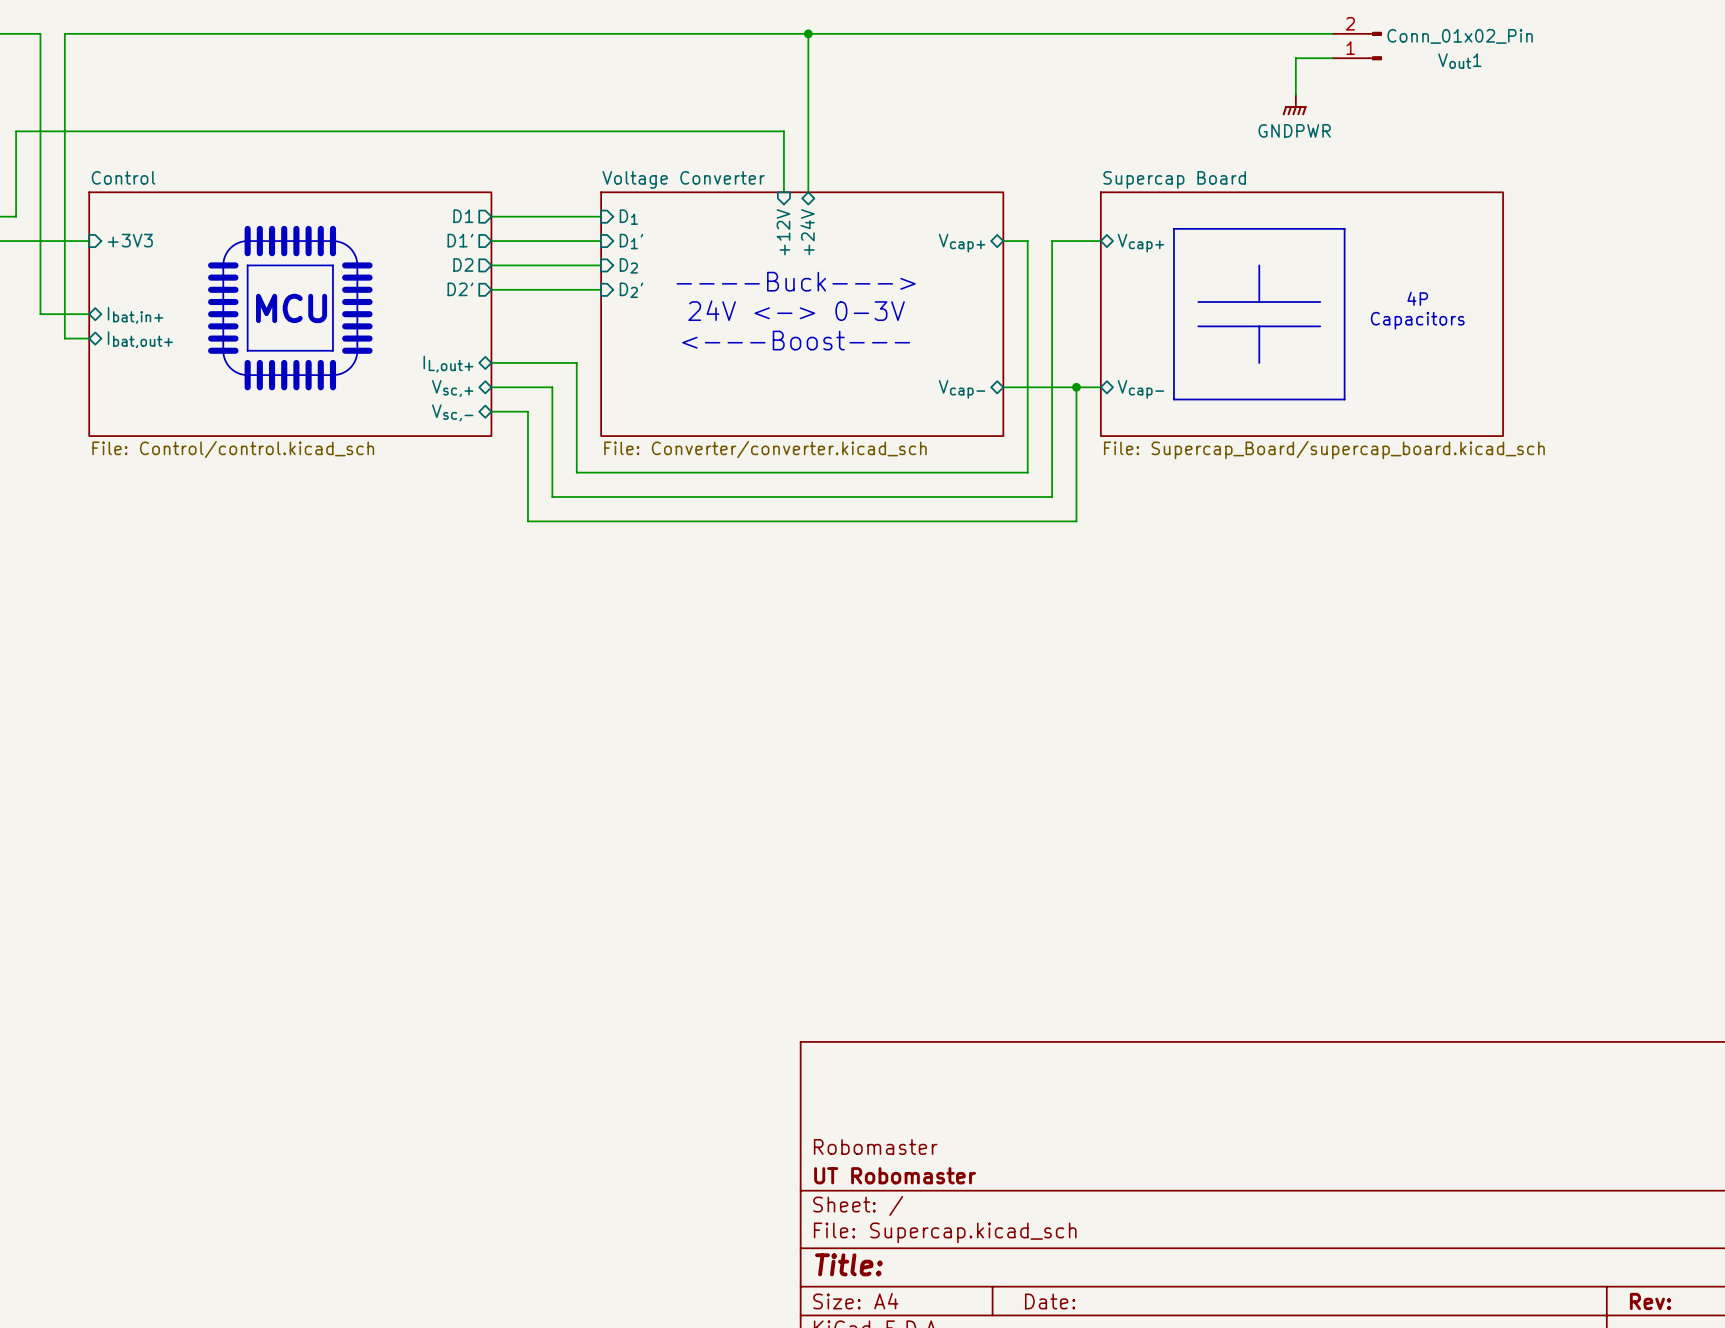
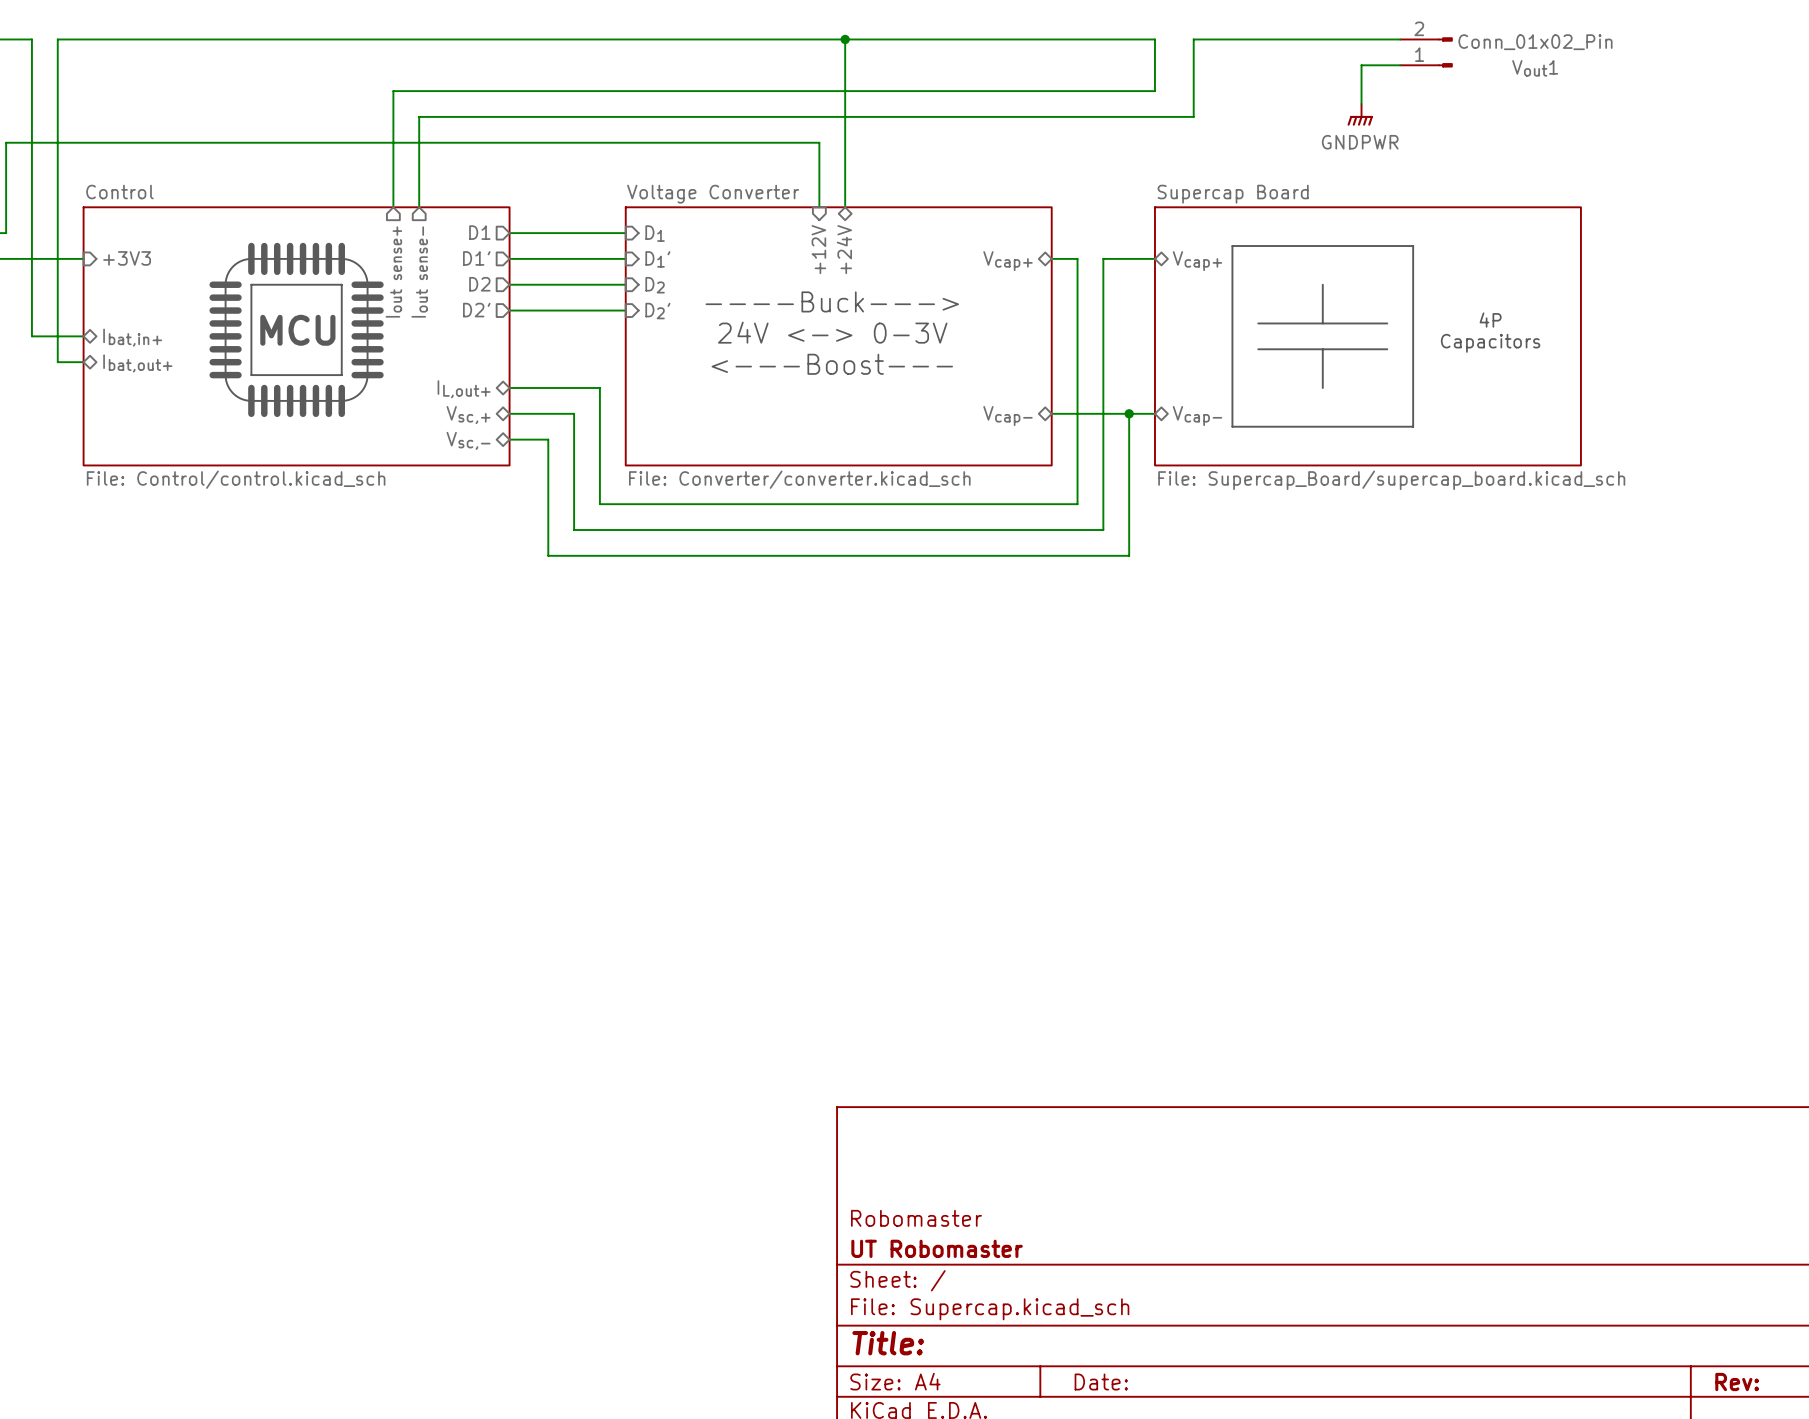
wire: (1100, 33) (1137, 33) -> (419, 207) (419, 116) (1193, 116) (1193, 39)
wire: none -> (1154, 39) (1154, 91) (393, 91) (393, 207)
hierarchical label: none -> Iout sense+ (393, 271)
hierarchical label: none -> Iout sense- (419, 271)

